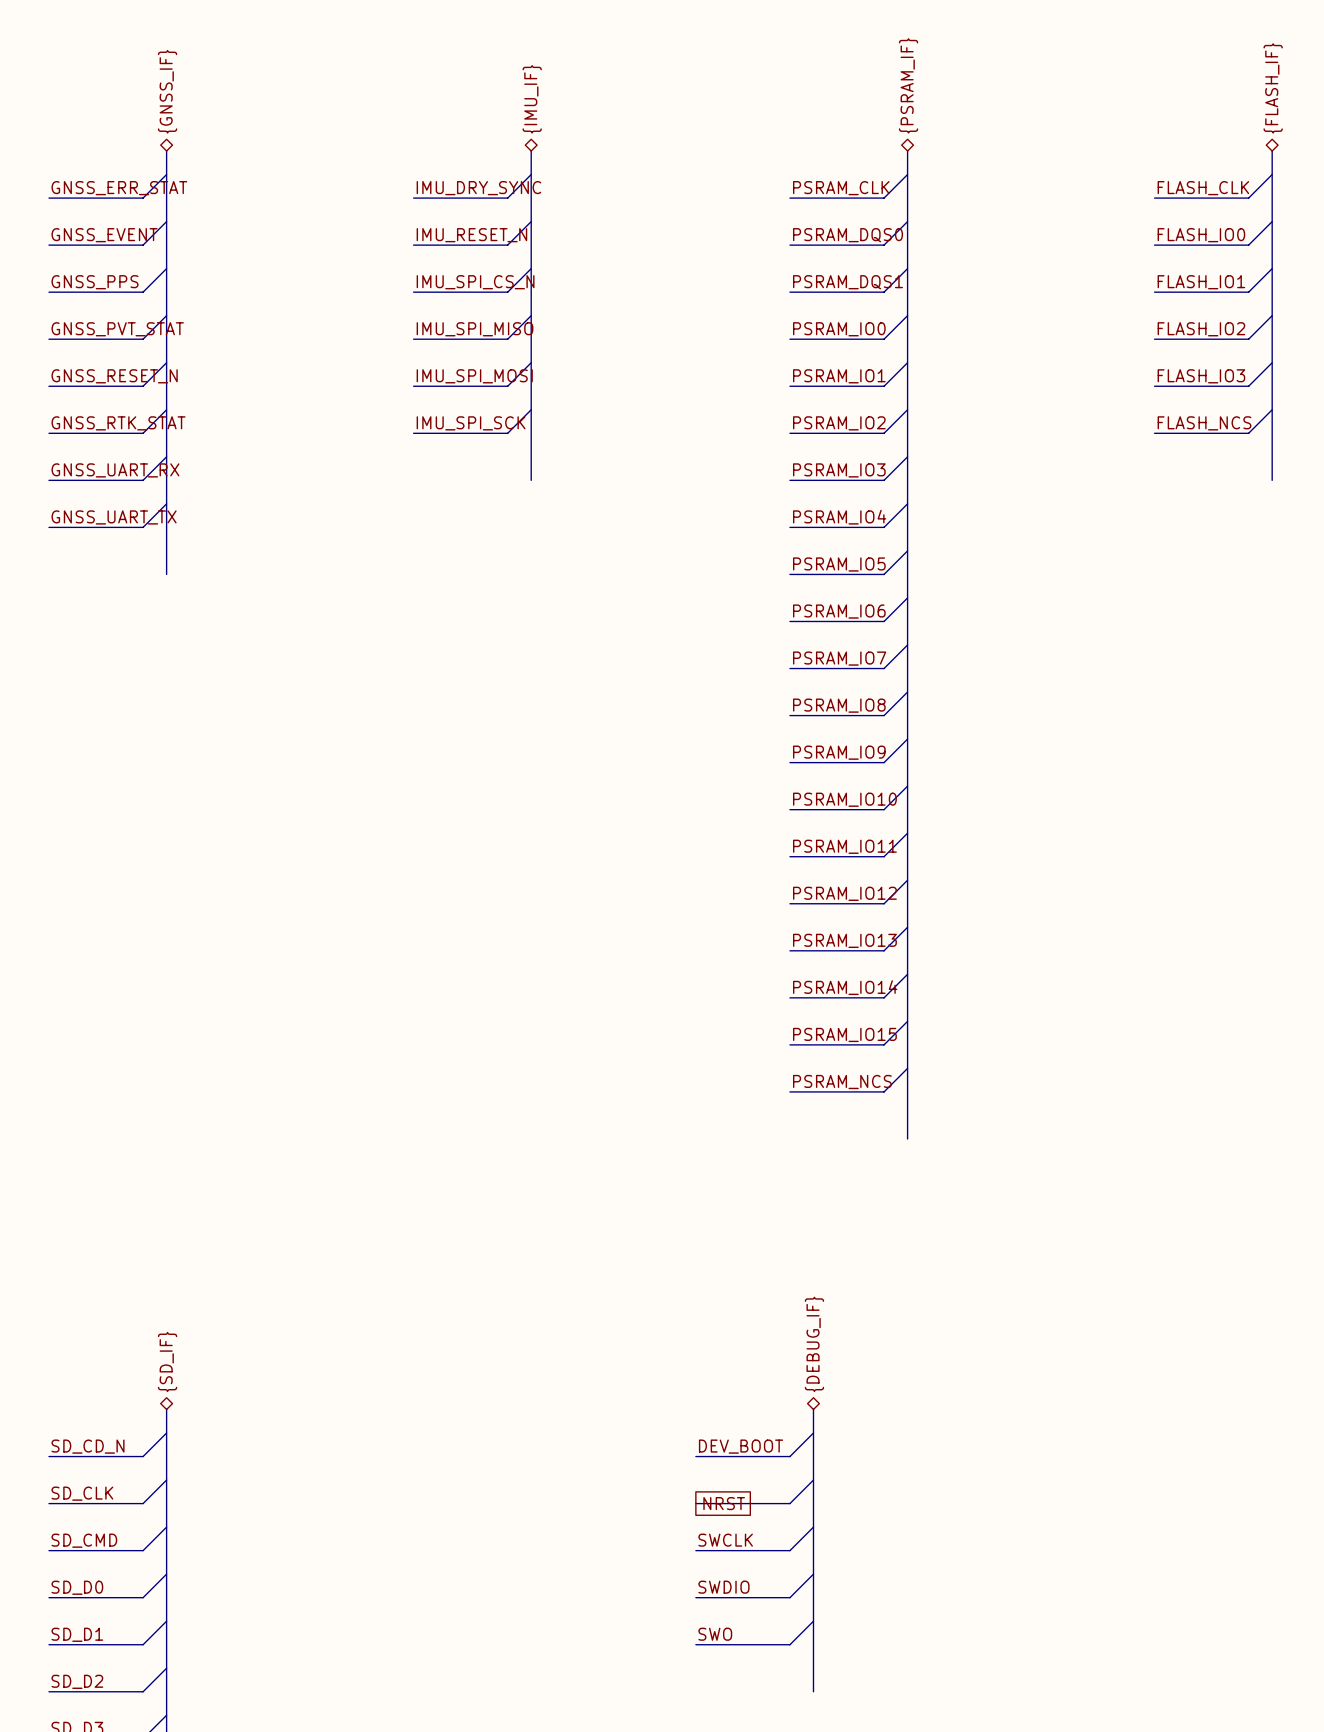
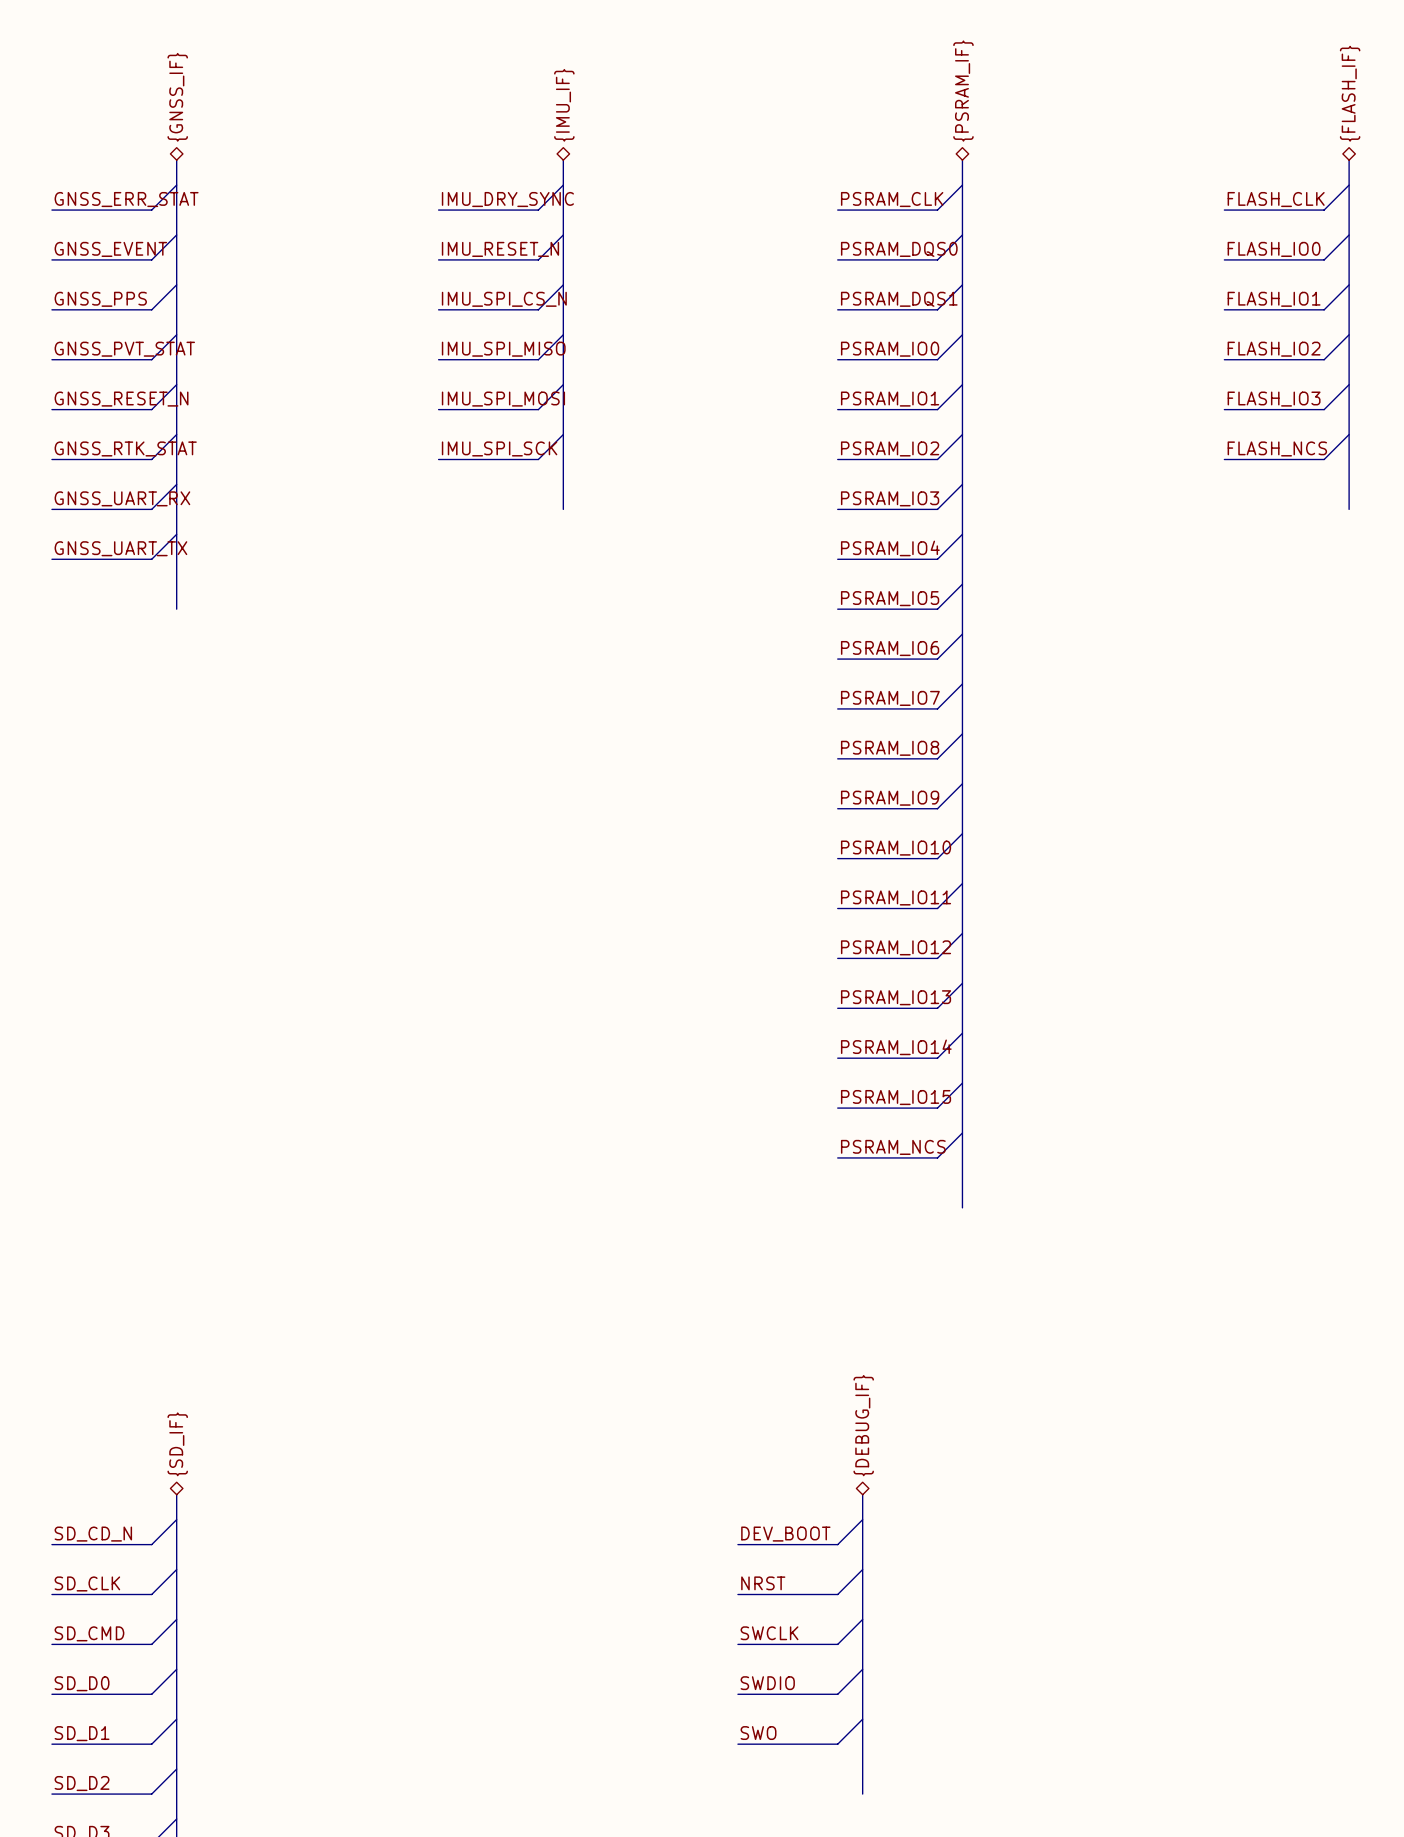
label: none -> NRST (763, 1583)
global label: NRST (724, 1503) -> none

